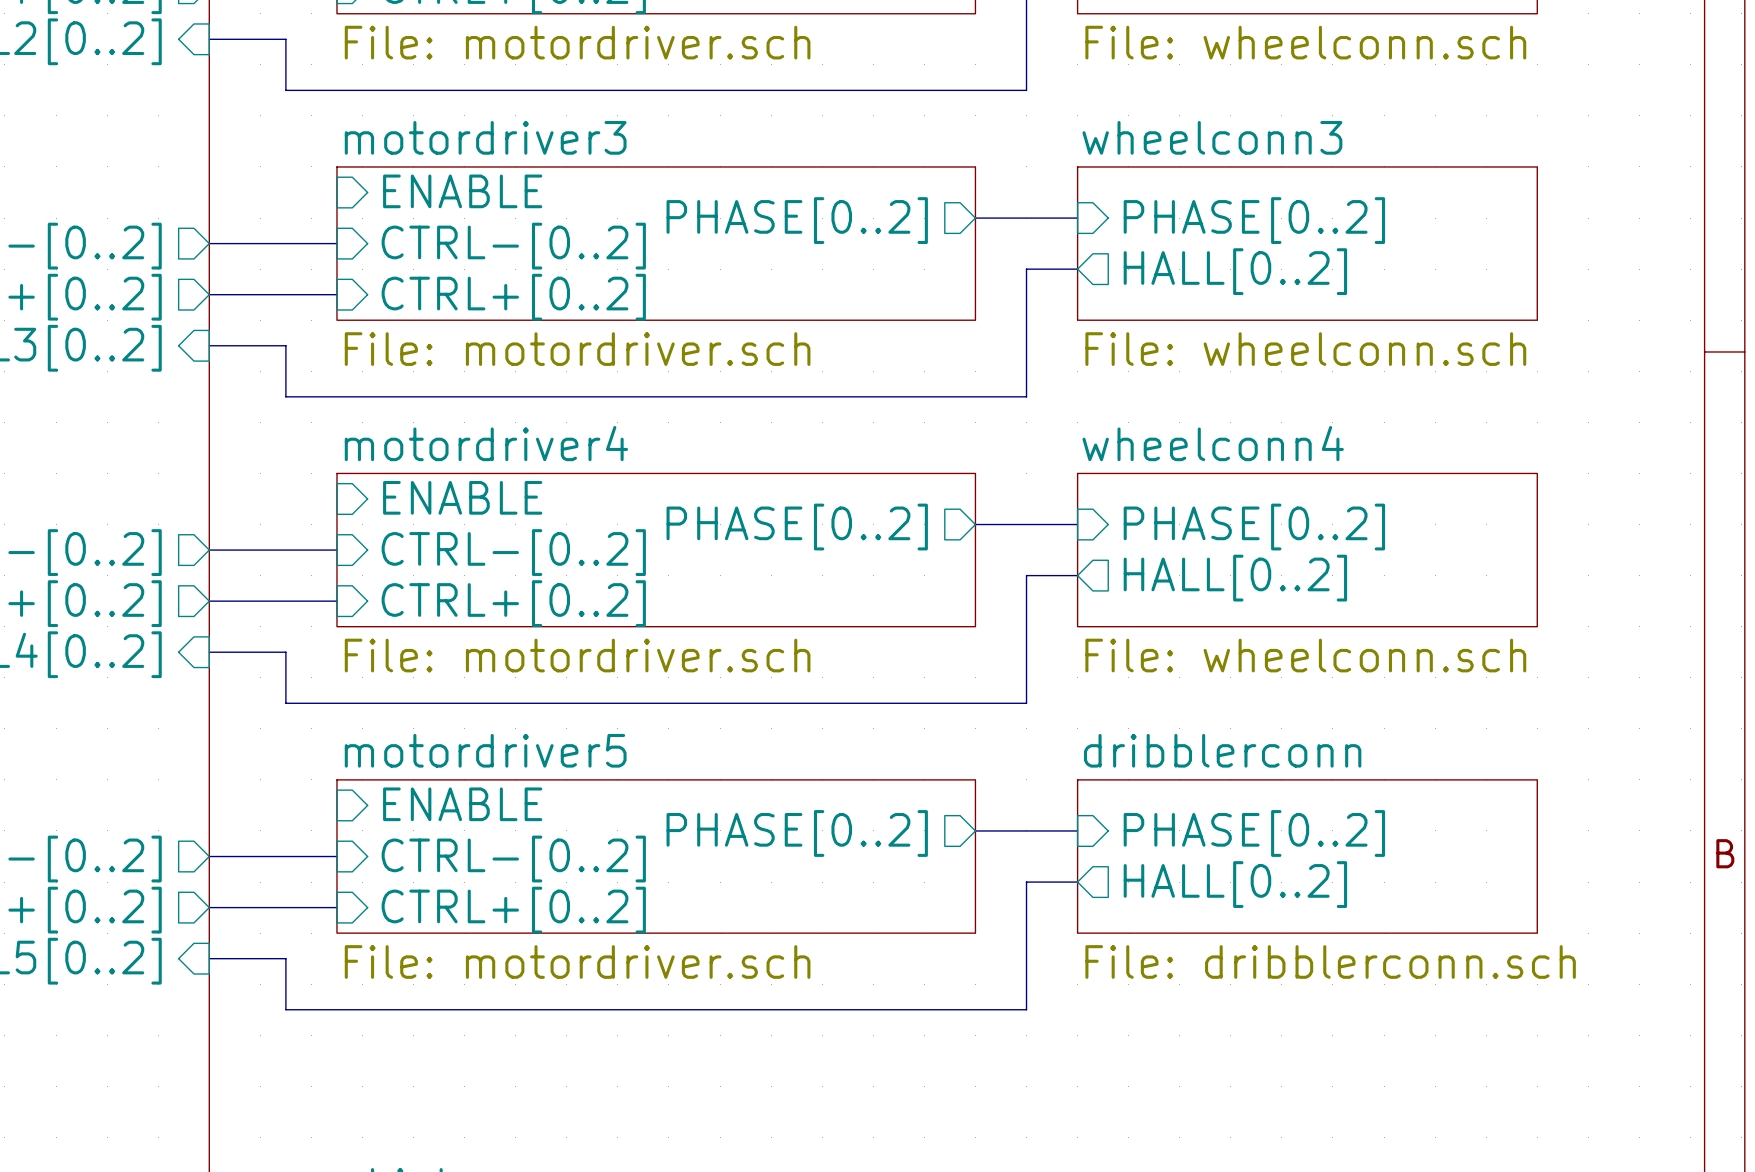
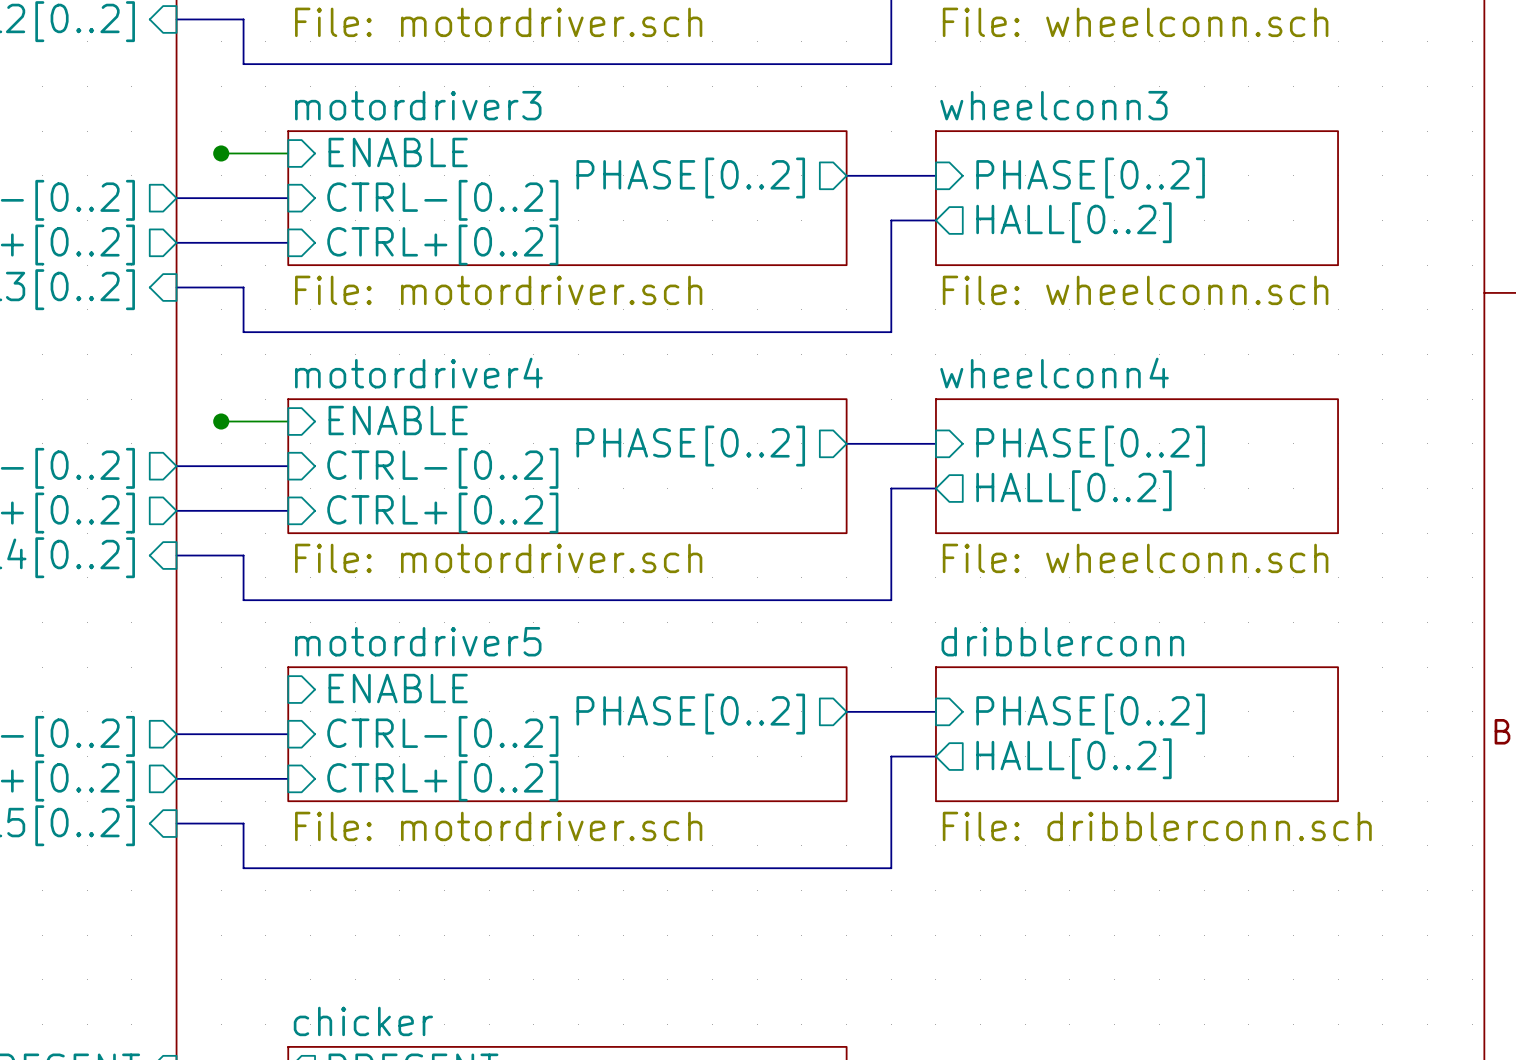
wire: none -> (221, 153) (288, 153)
junction: none -> (221, 153)
wire: none -> (221, 421) (288, 421)
junction: none -> (221, 421)

